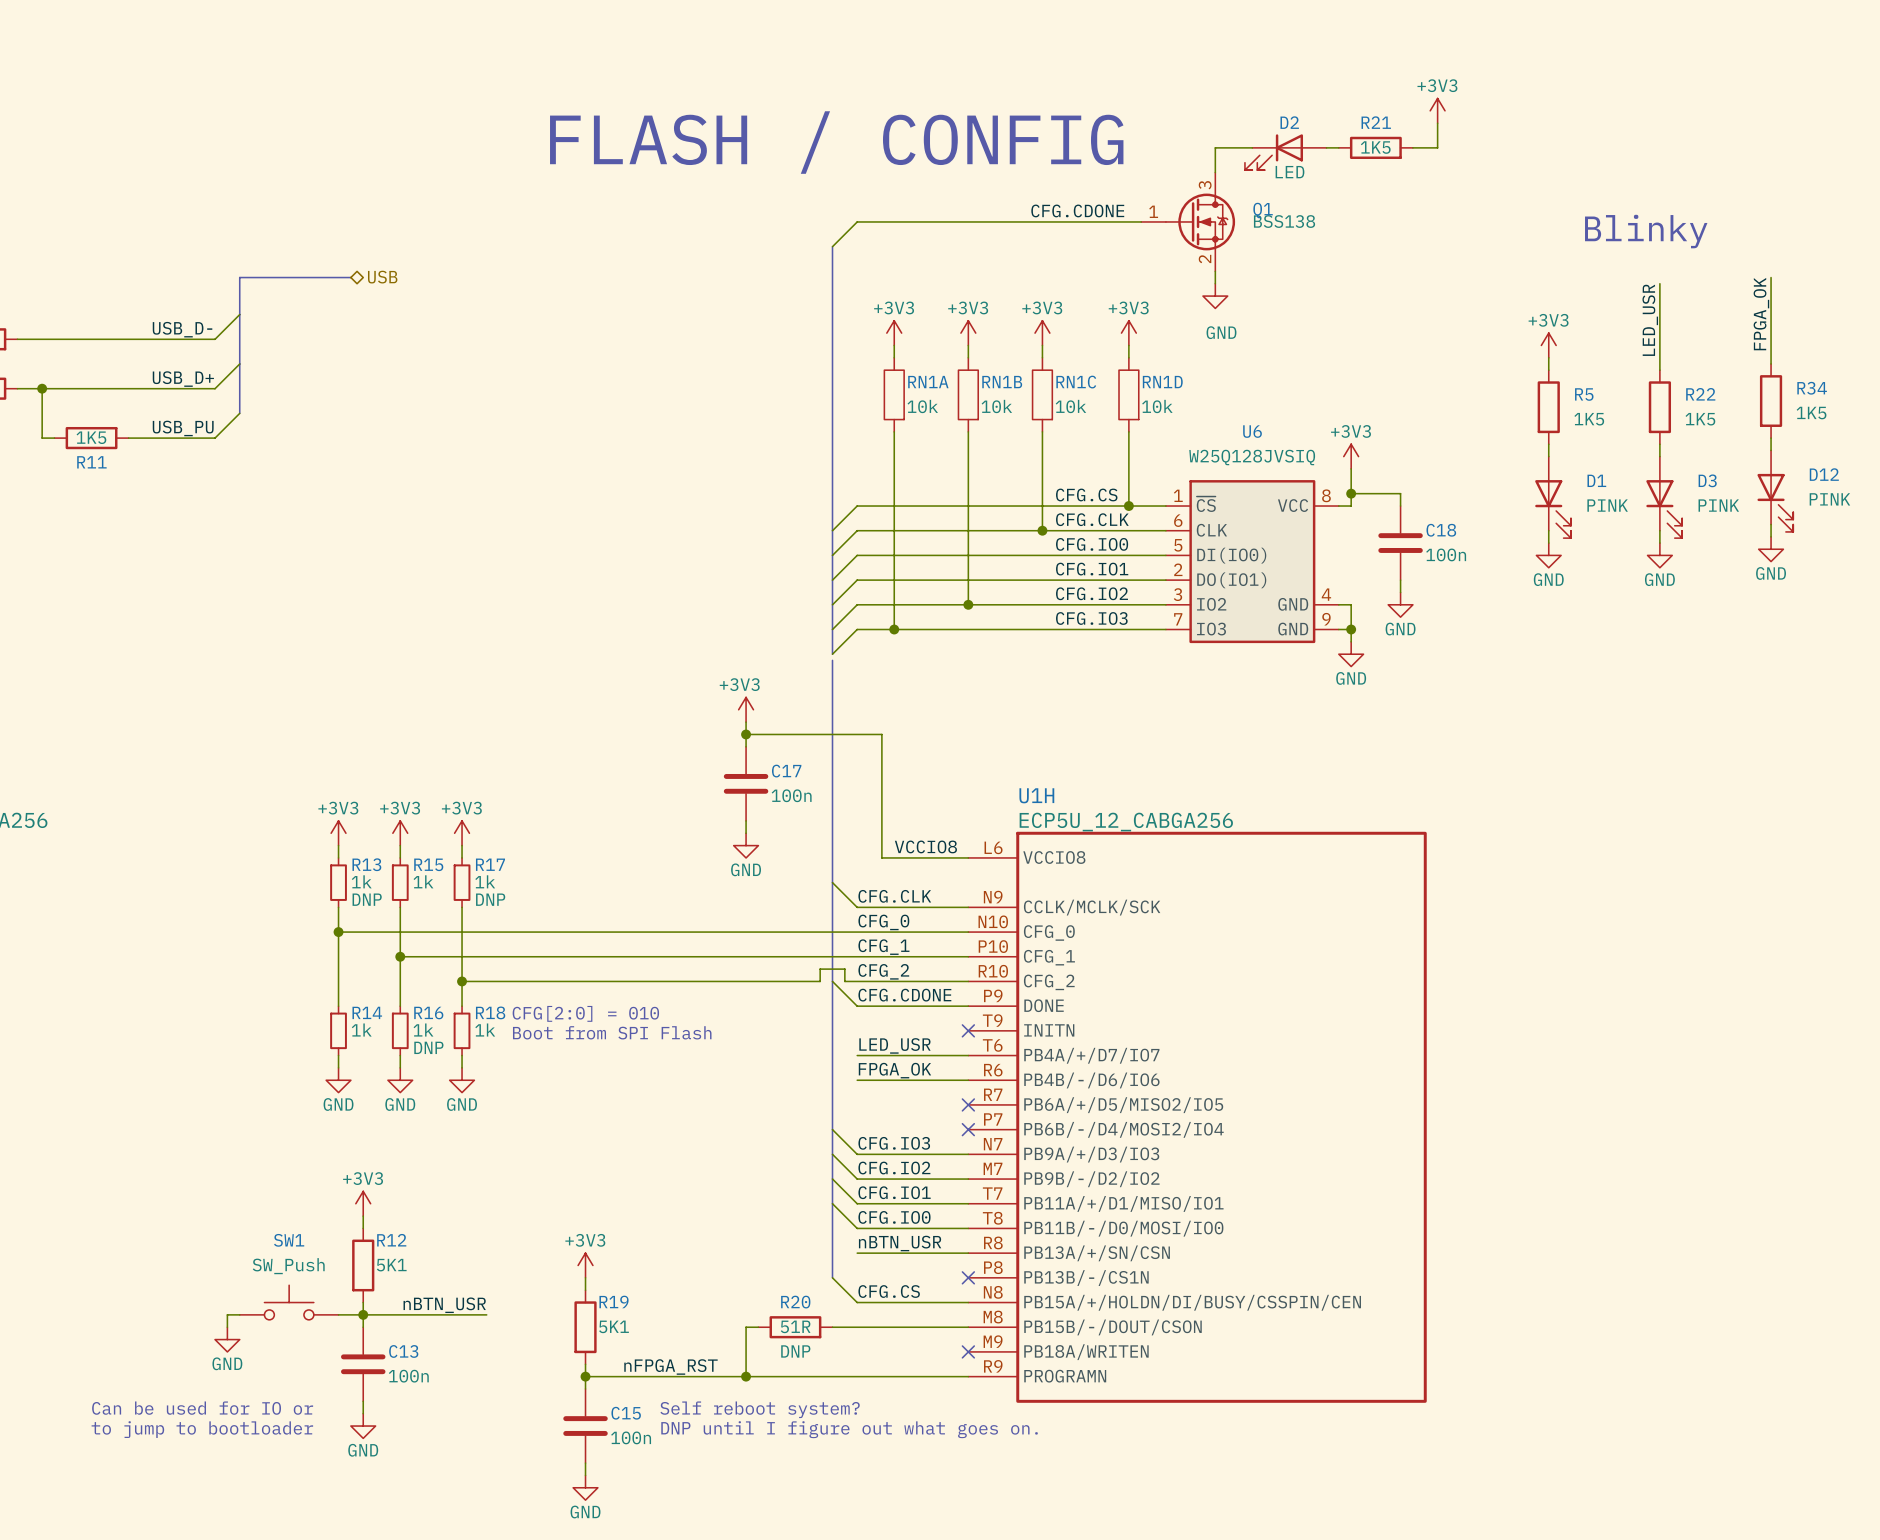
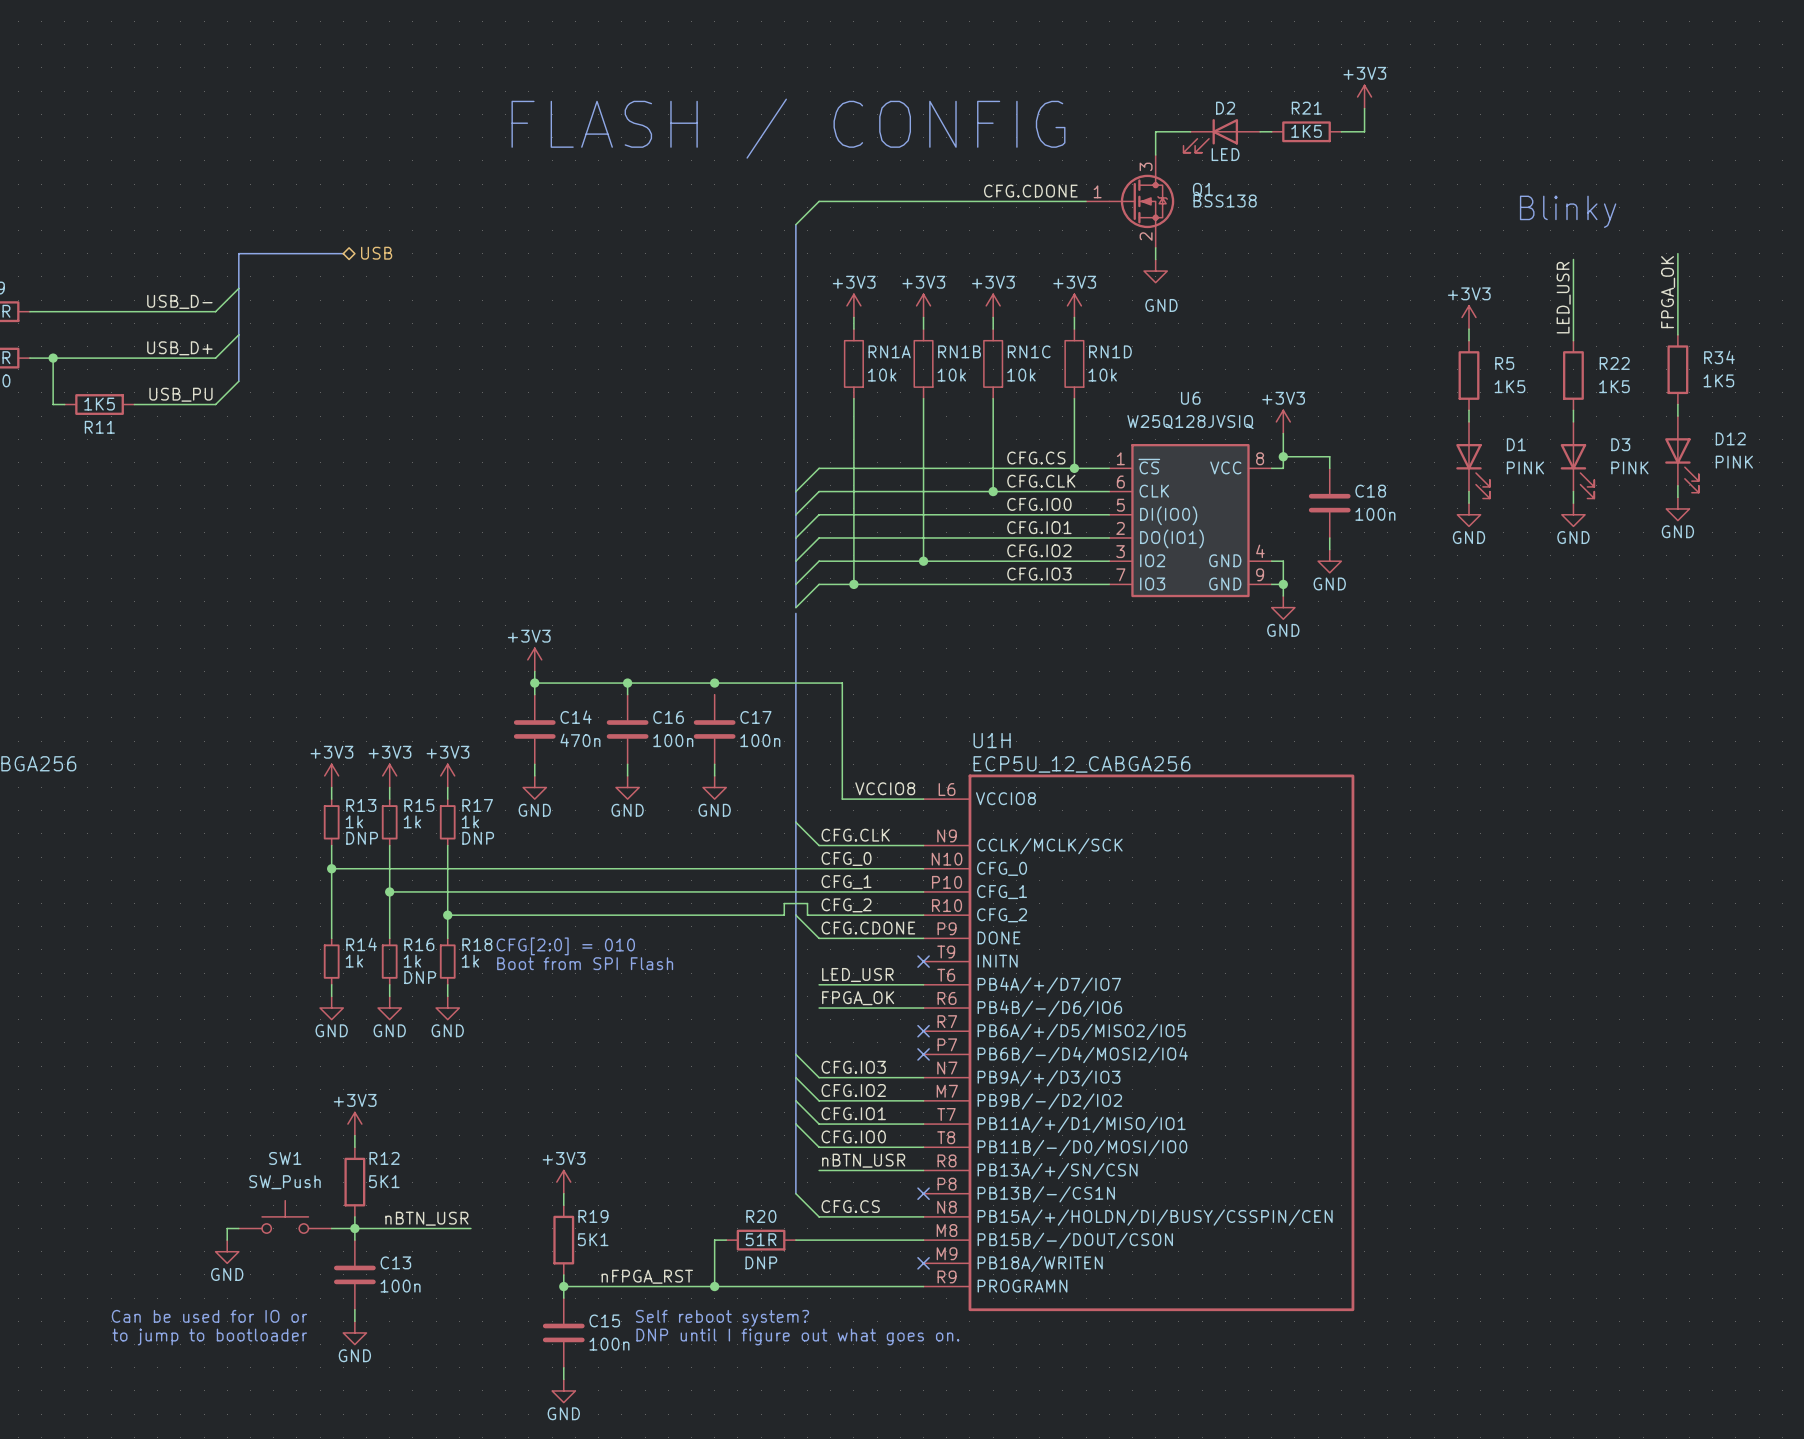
power symbol position: +3V3 (746, 709) -> +3V3 (534, 659)
wire: (746, 722) (746, 746) -> (534, 671) (534, 694)
wire: none -> (534, 683) (714, 683)
junction: none -> (534, 683)
wire: none -> (627, 683) (627, 694)
junction: none -> (627, 683)
C14: none -> 470n (534, 729)
C16: none -> 100n (627, 729)
wire: none -> (534, 764) (534, 775)
wire: none -> (627, 764) (627, 775)
power symbol: none -> GND (534, 787)
power symbol: none -> GND (627, 787)

